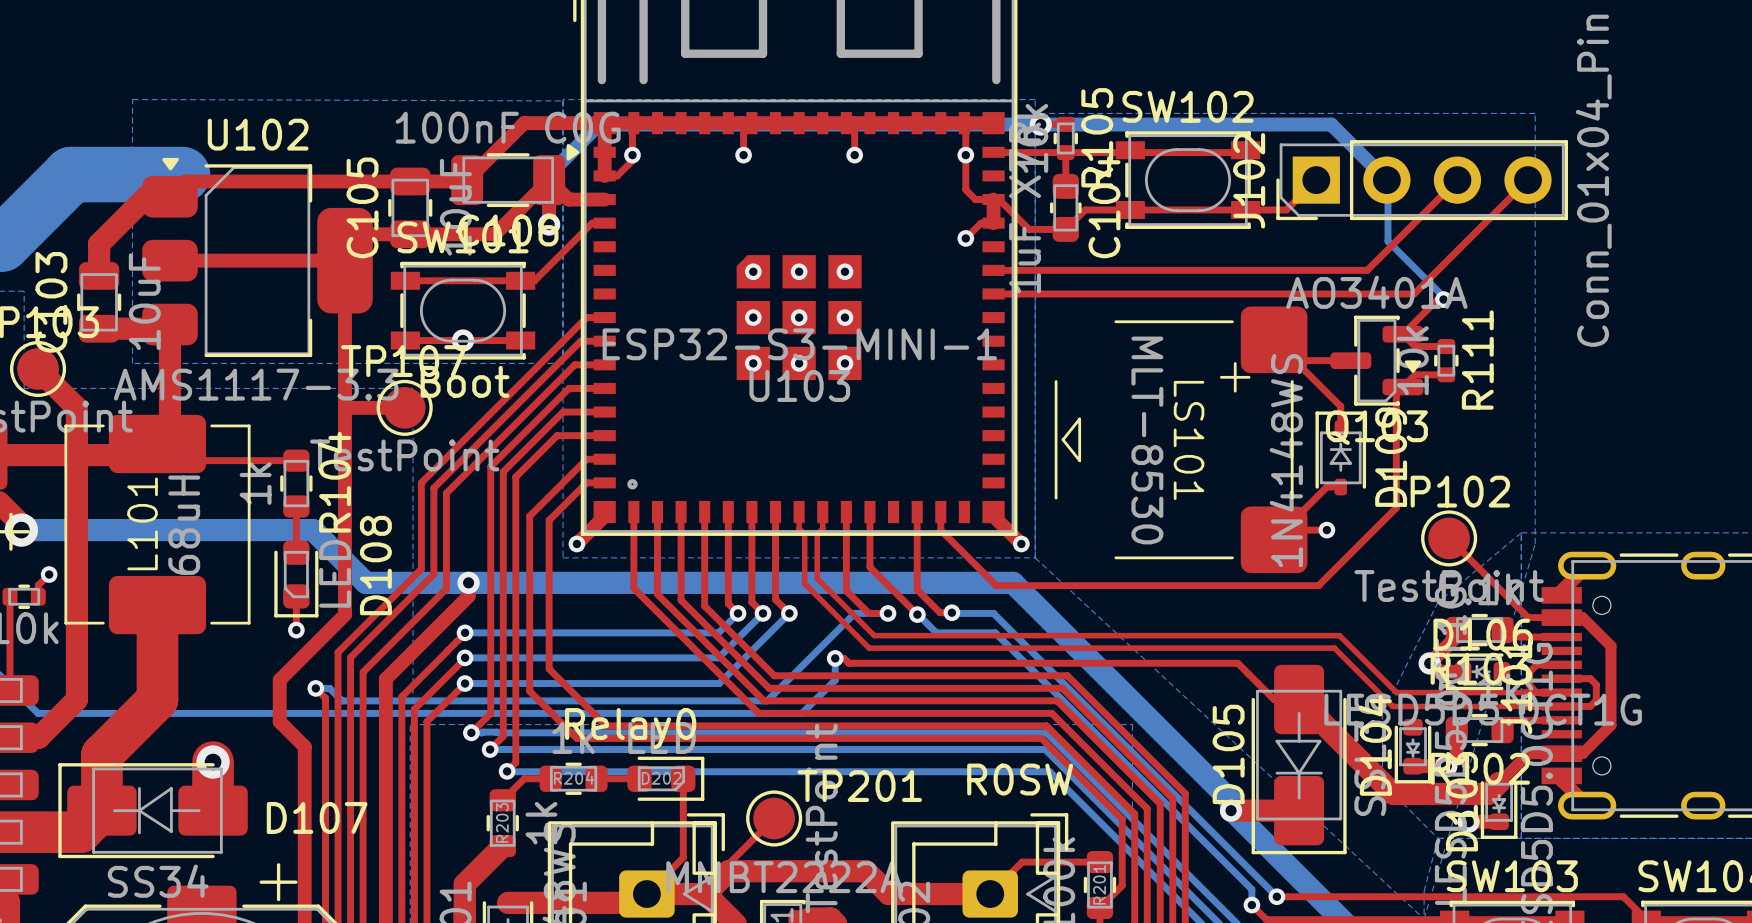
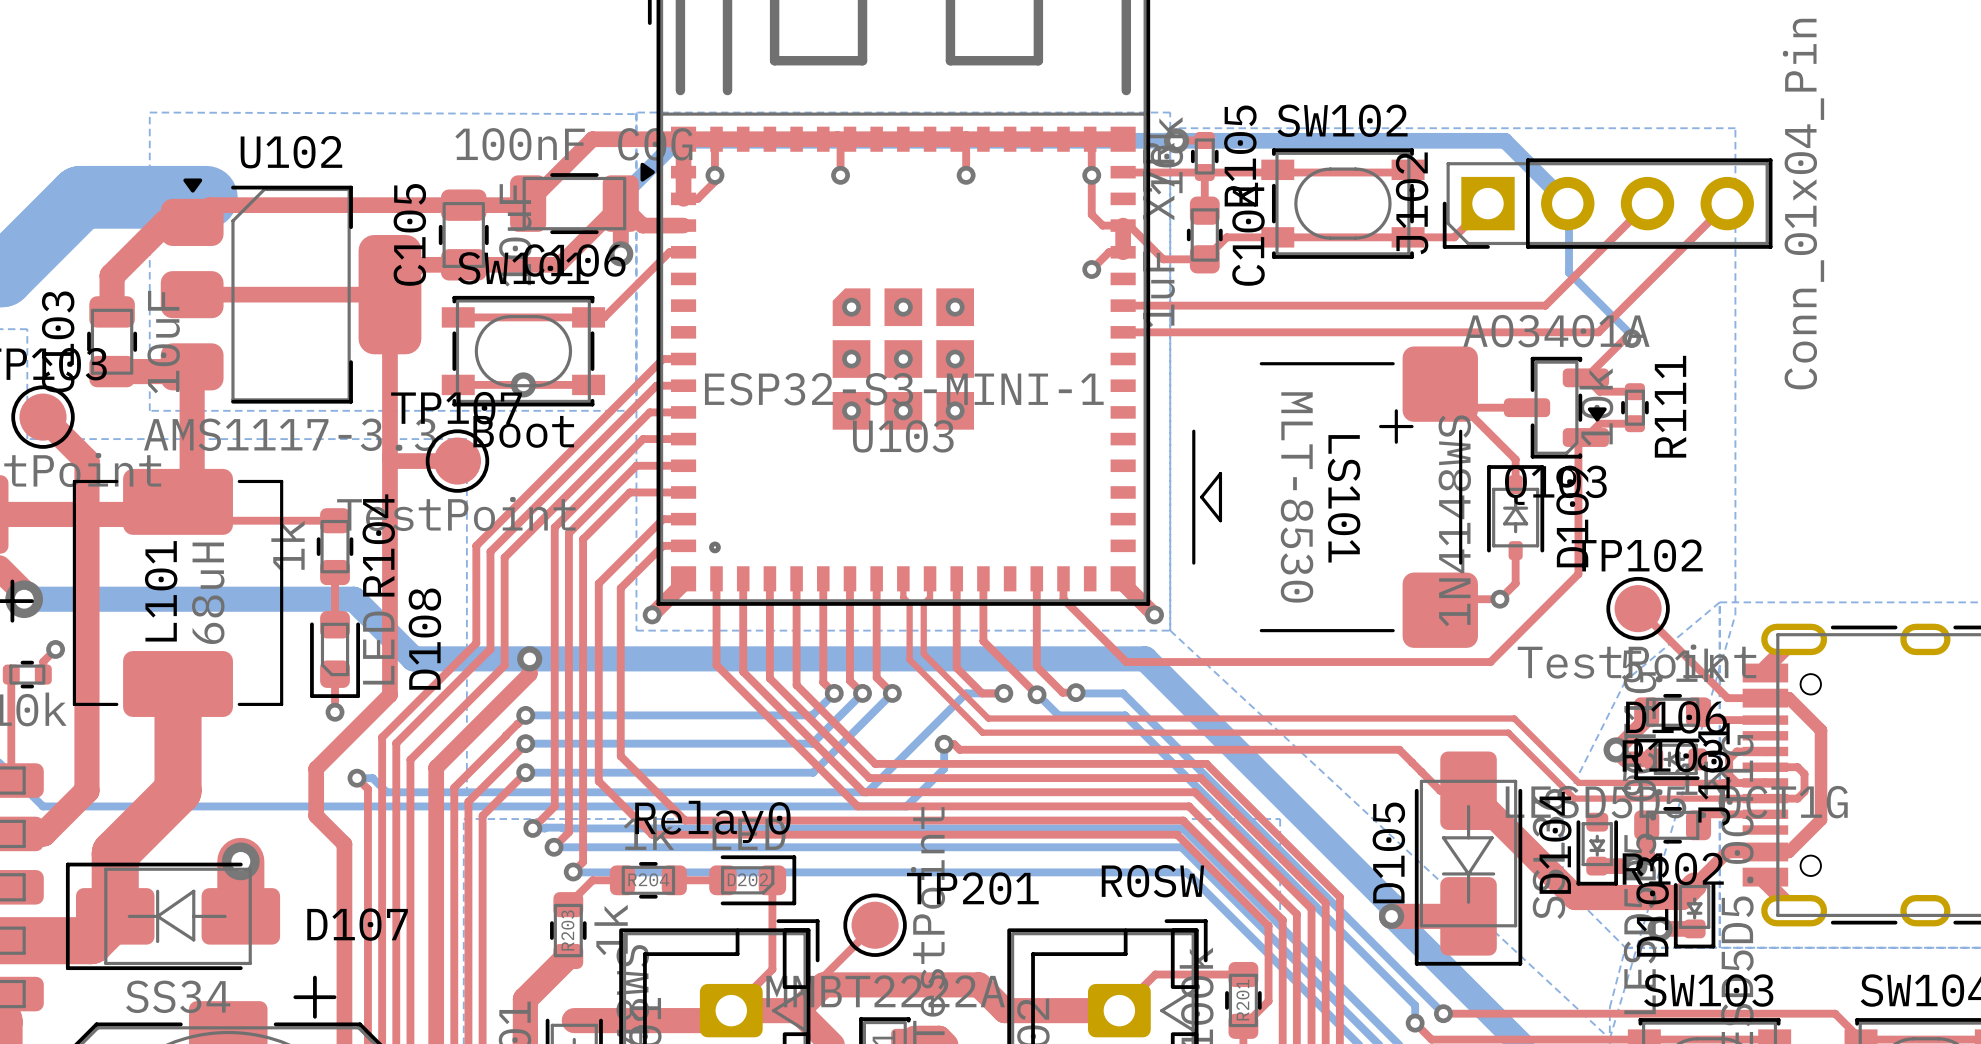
top track: (1340, 487) (1326, 487) (1283, 530) -> (1515, 550) (1515, 583) (1499, 599)

